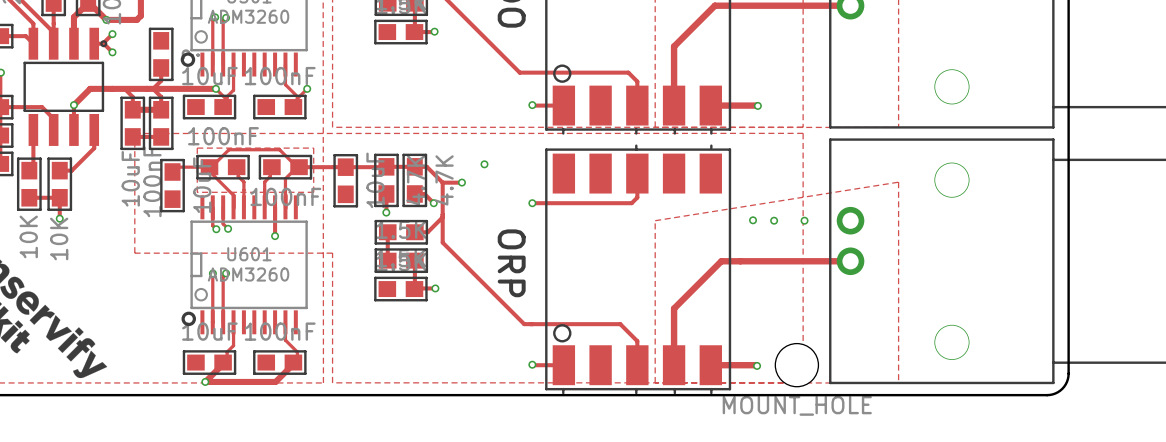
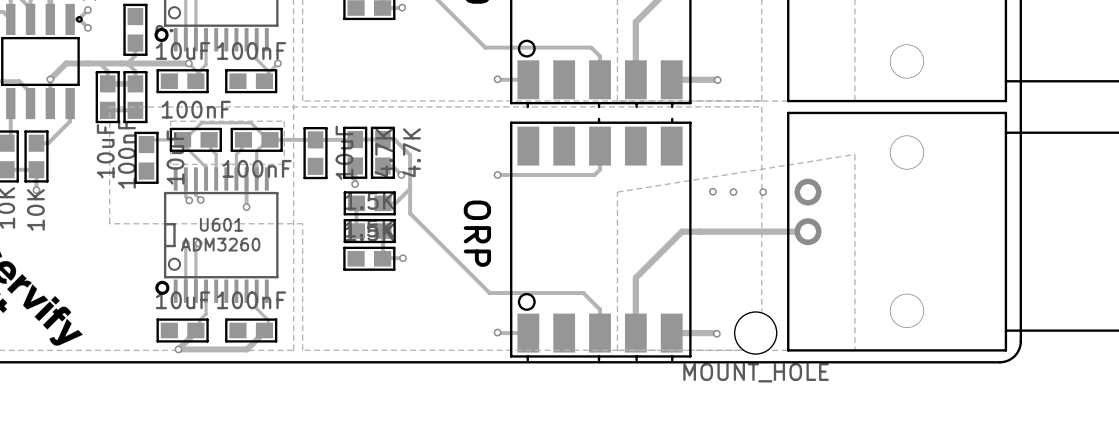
via: (484, 164) -> none
track: (442, 182) (461, 182) -> none
via: (461, 182) -> none

